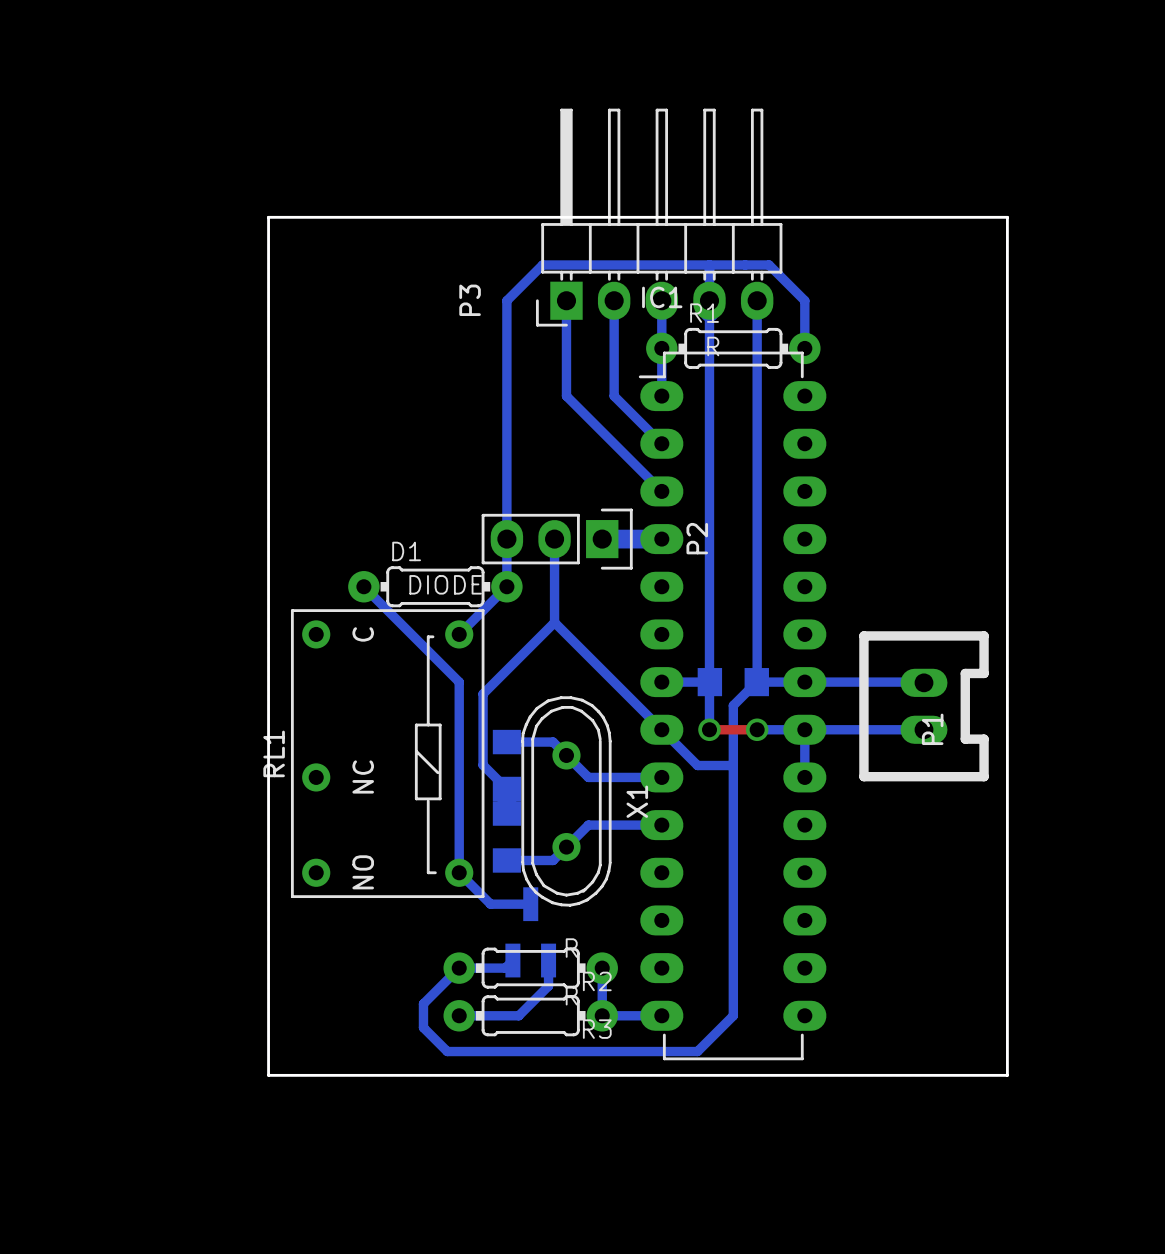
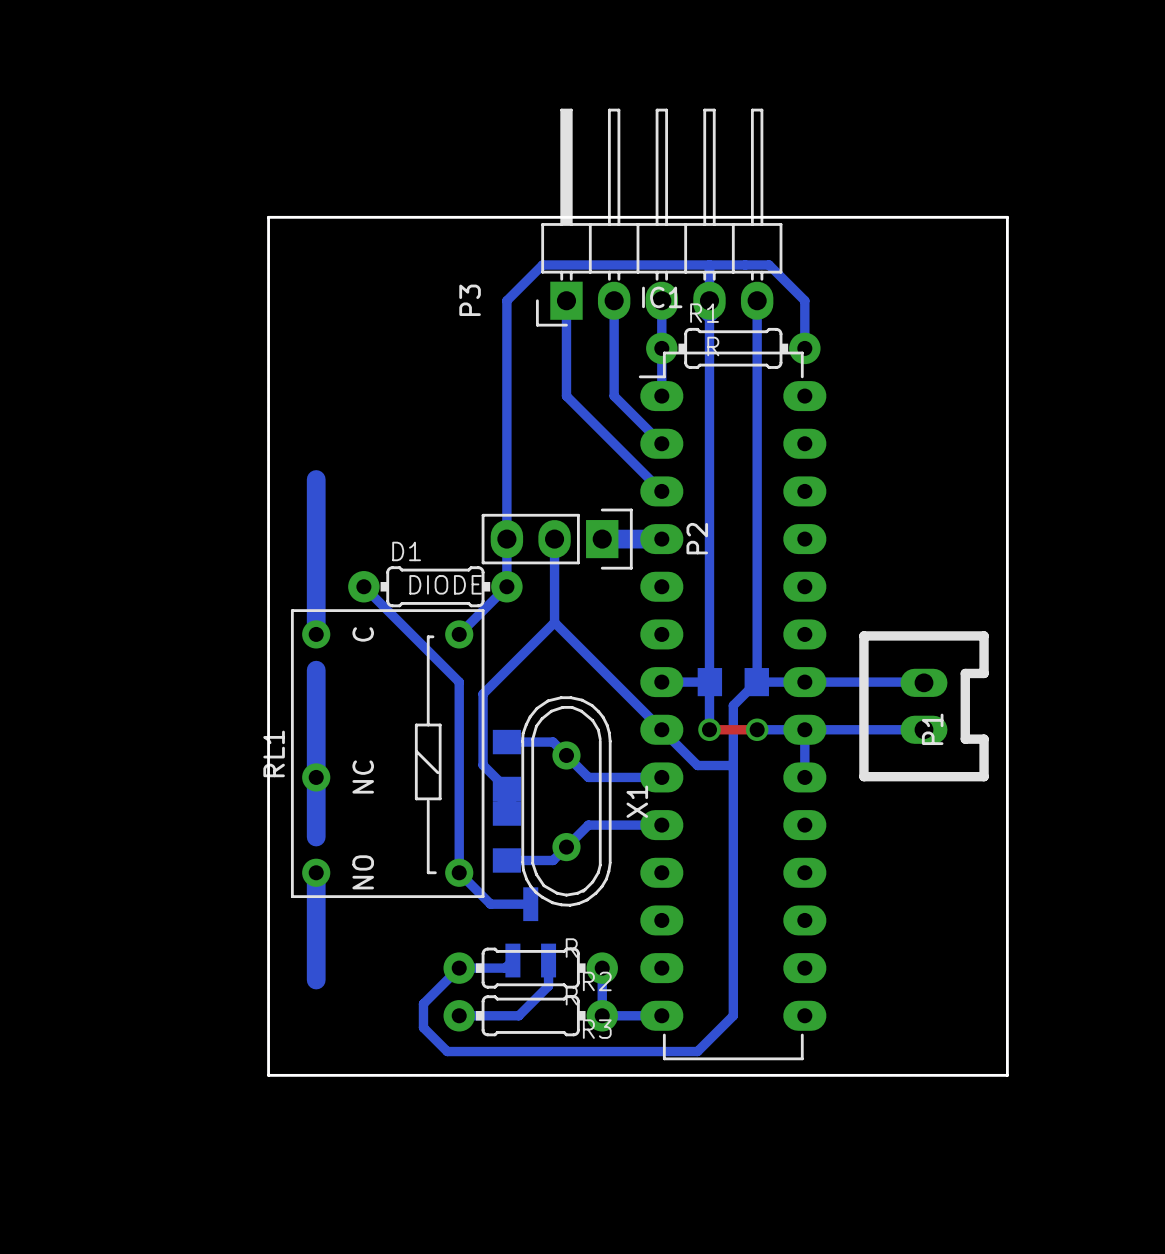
bottom track: none -> (316, 479) (316, 634)
bottom track: none -> (316, 670) (316, 837)
bottom track: none -> (316, 872) (316, 980)

